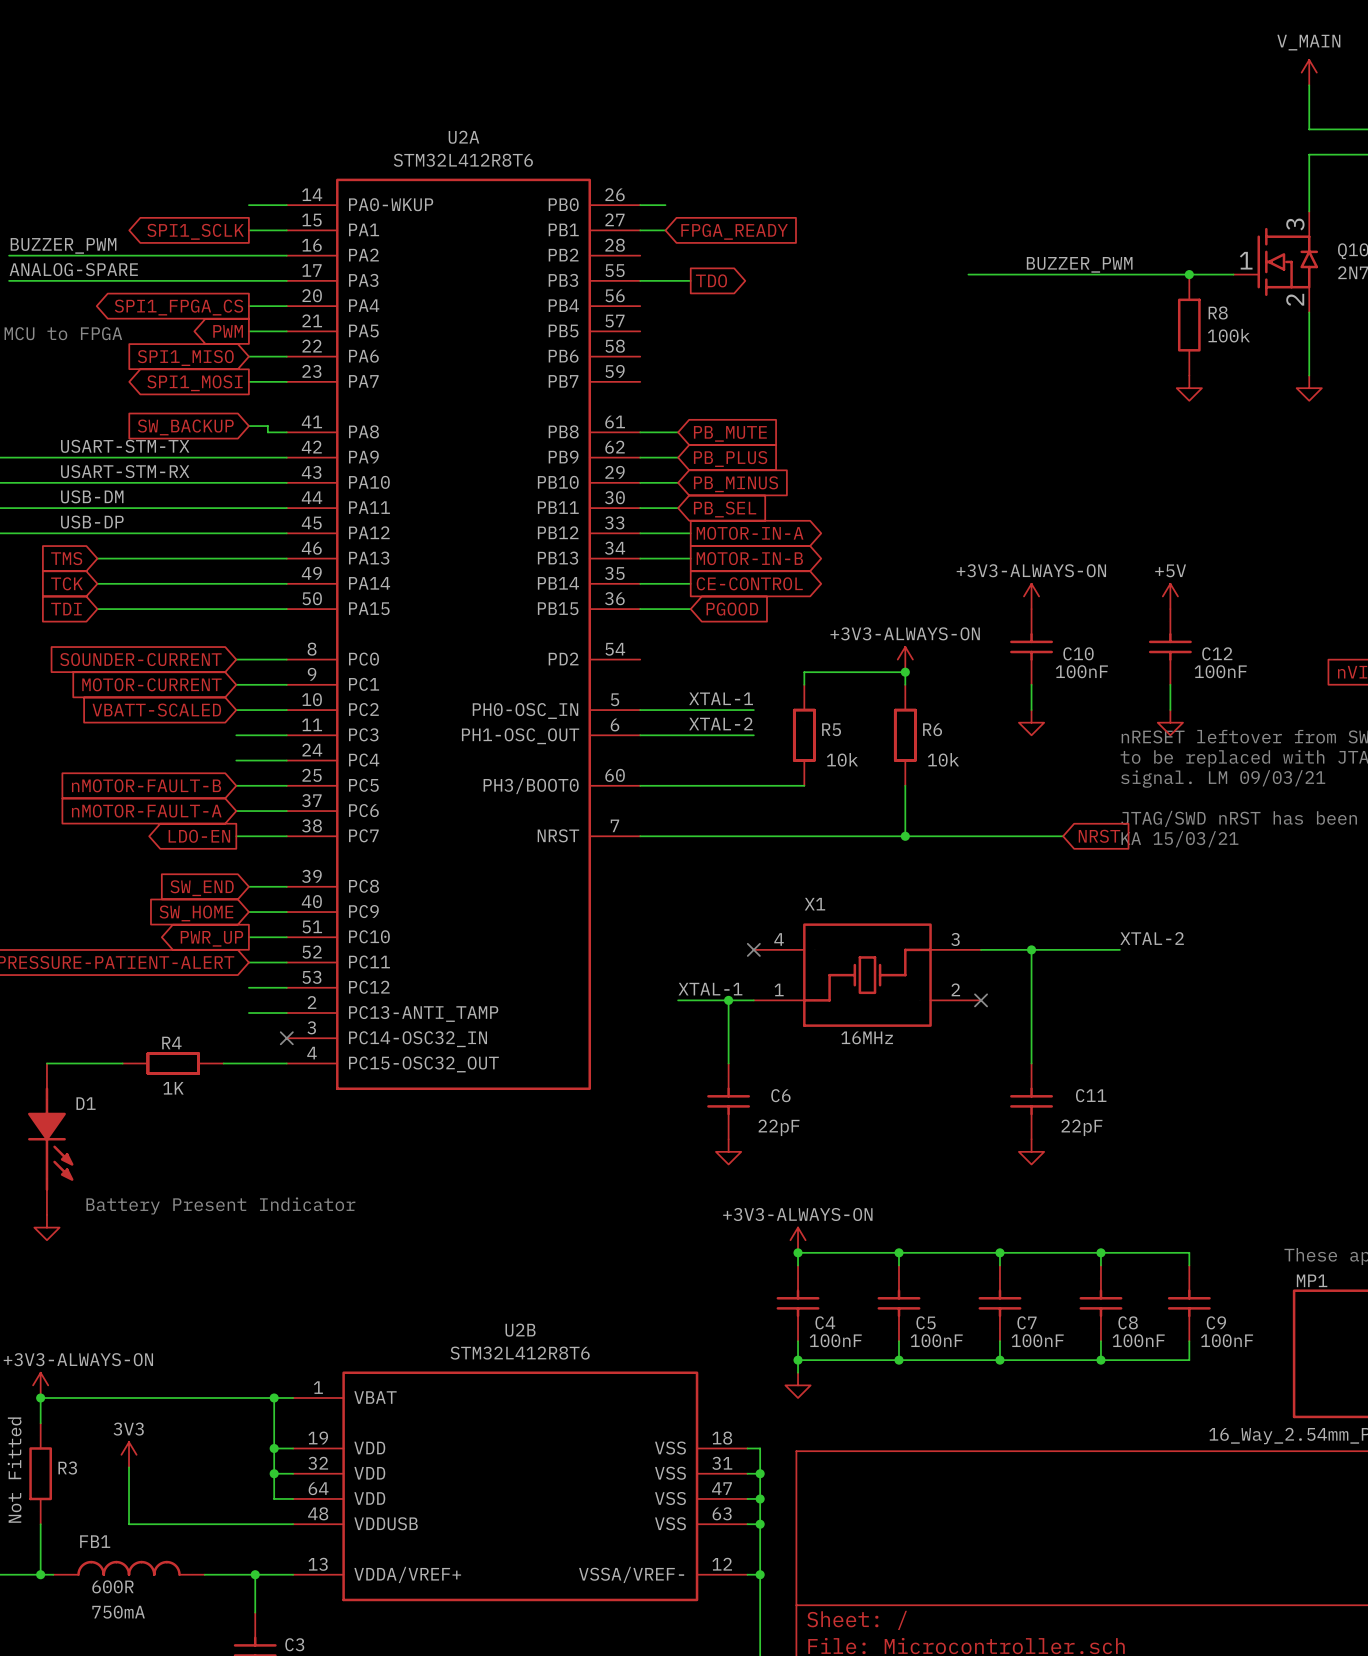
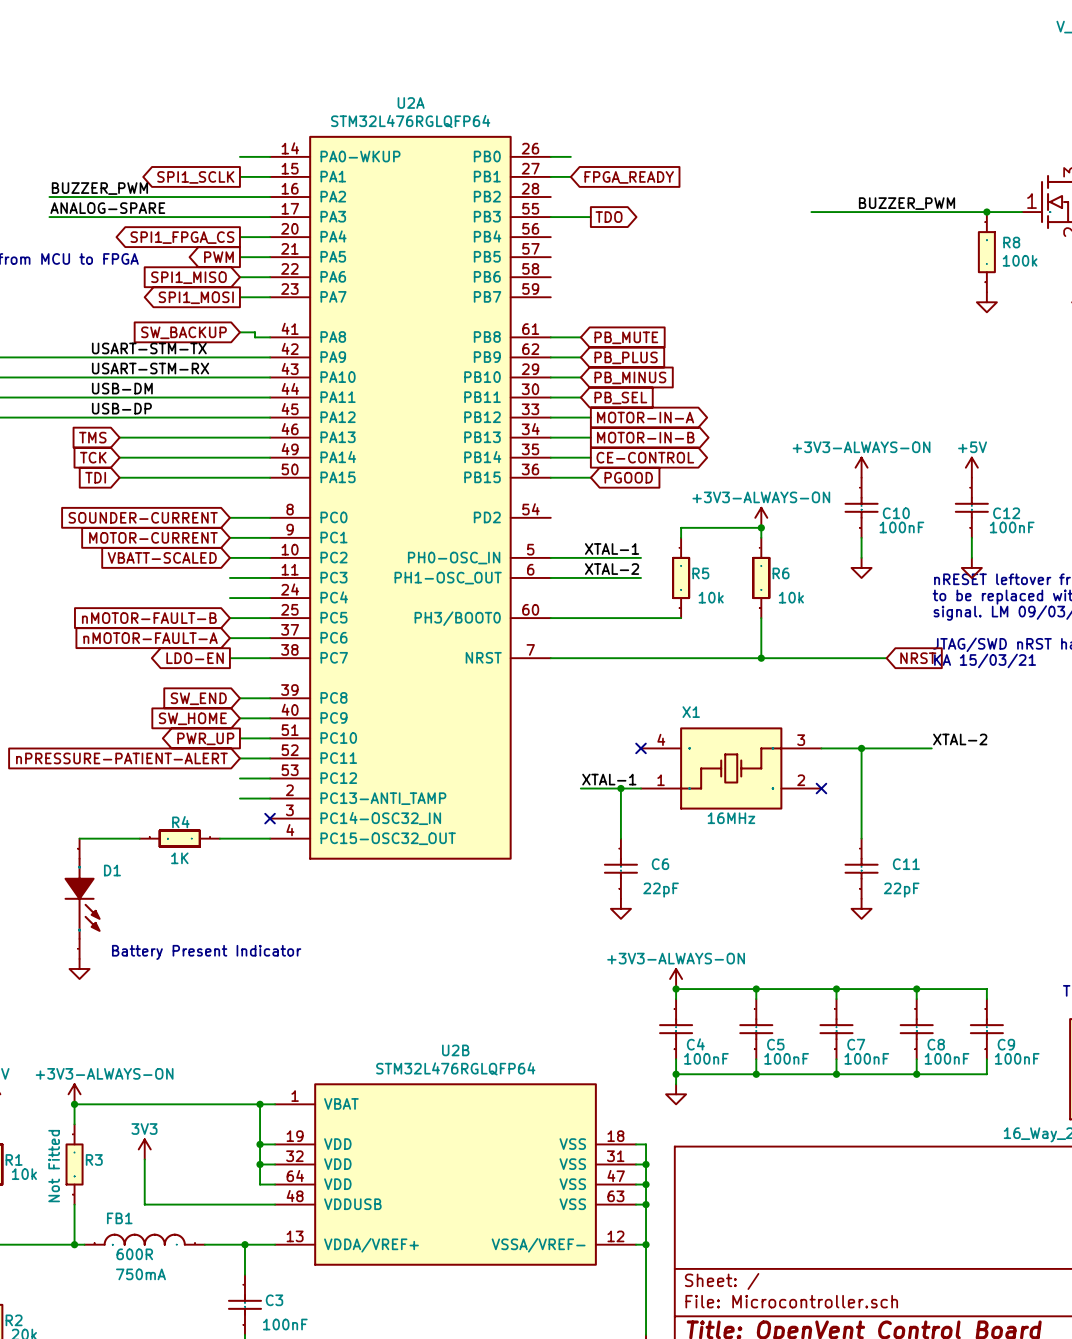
U2A value: STM32L412R8T6 (463, 160) -> STM32L476RGLQFP64 (410, 121)
U2B value: STM32L412R8T6 (520, 1353) -> STM32L476RGLQFP64 (455, 1068)

